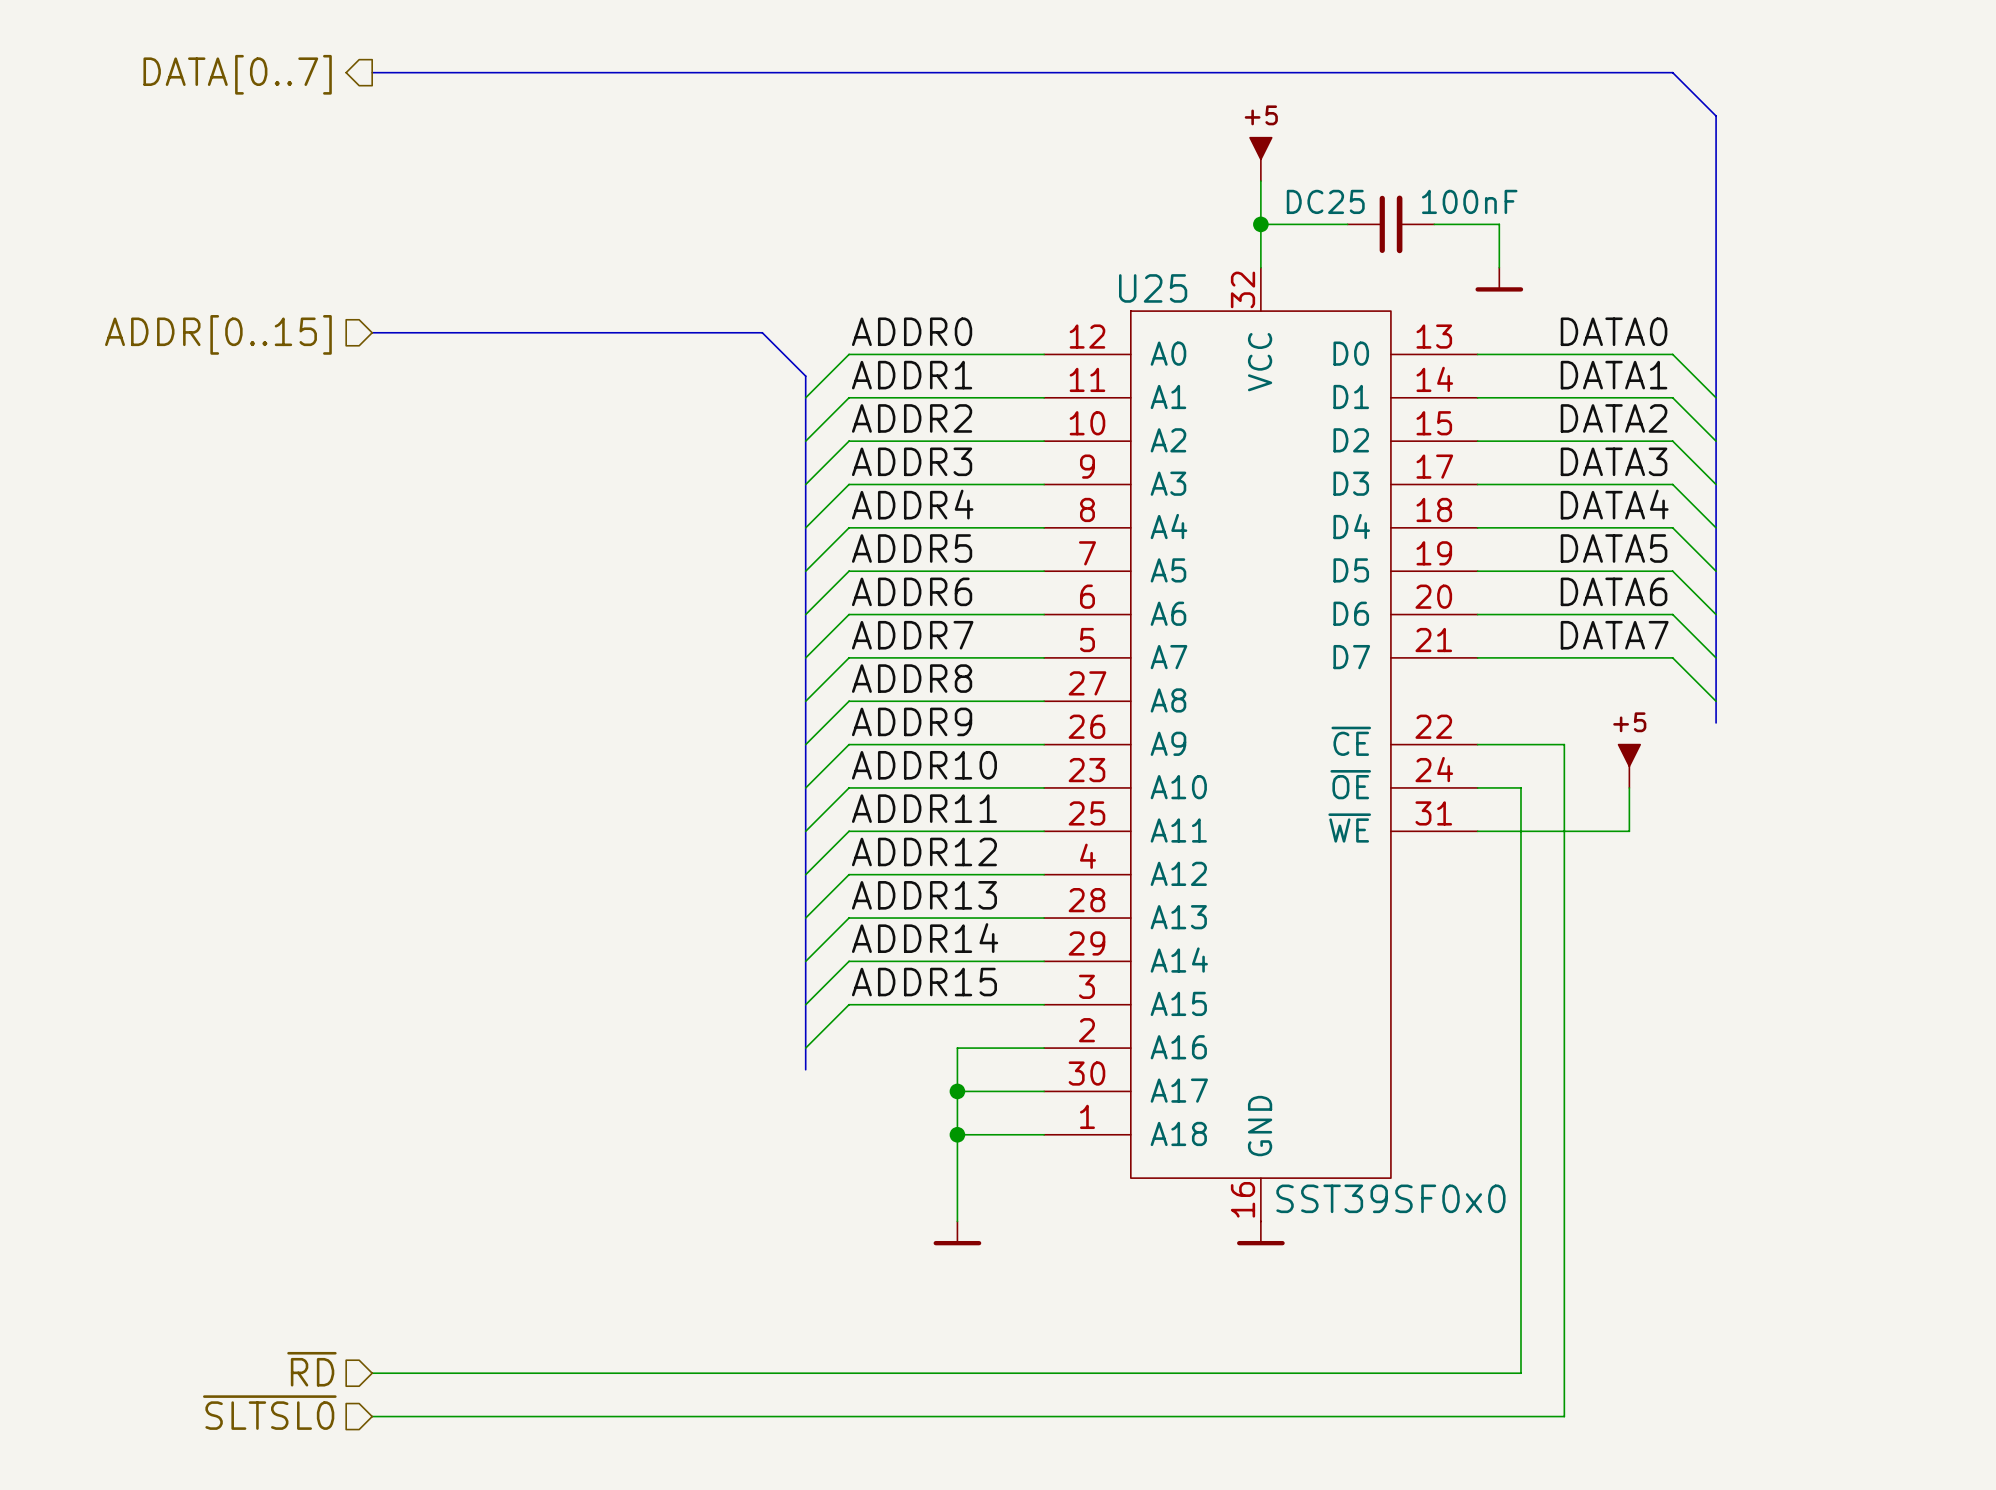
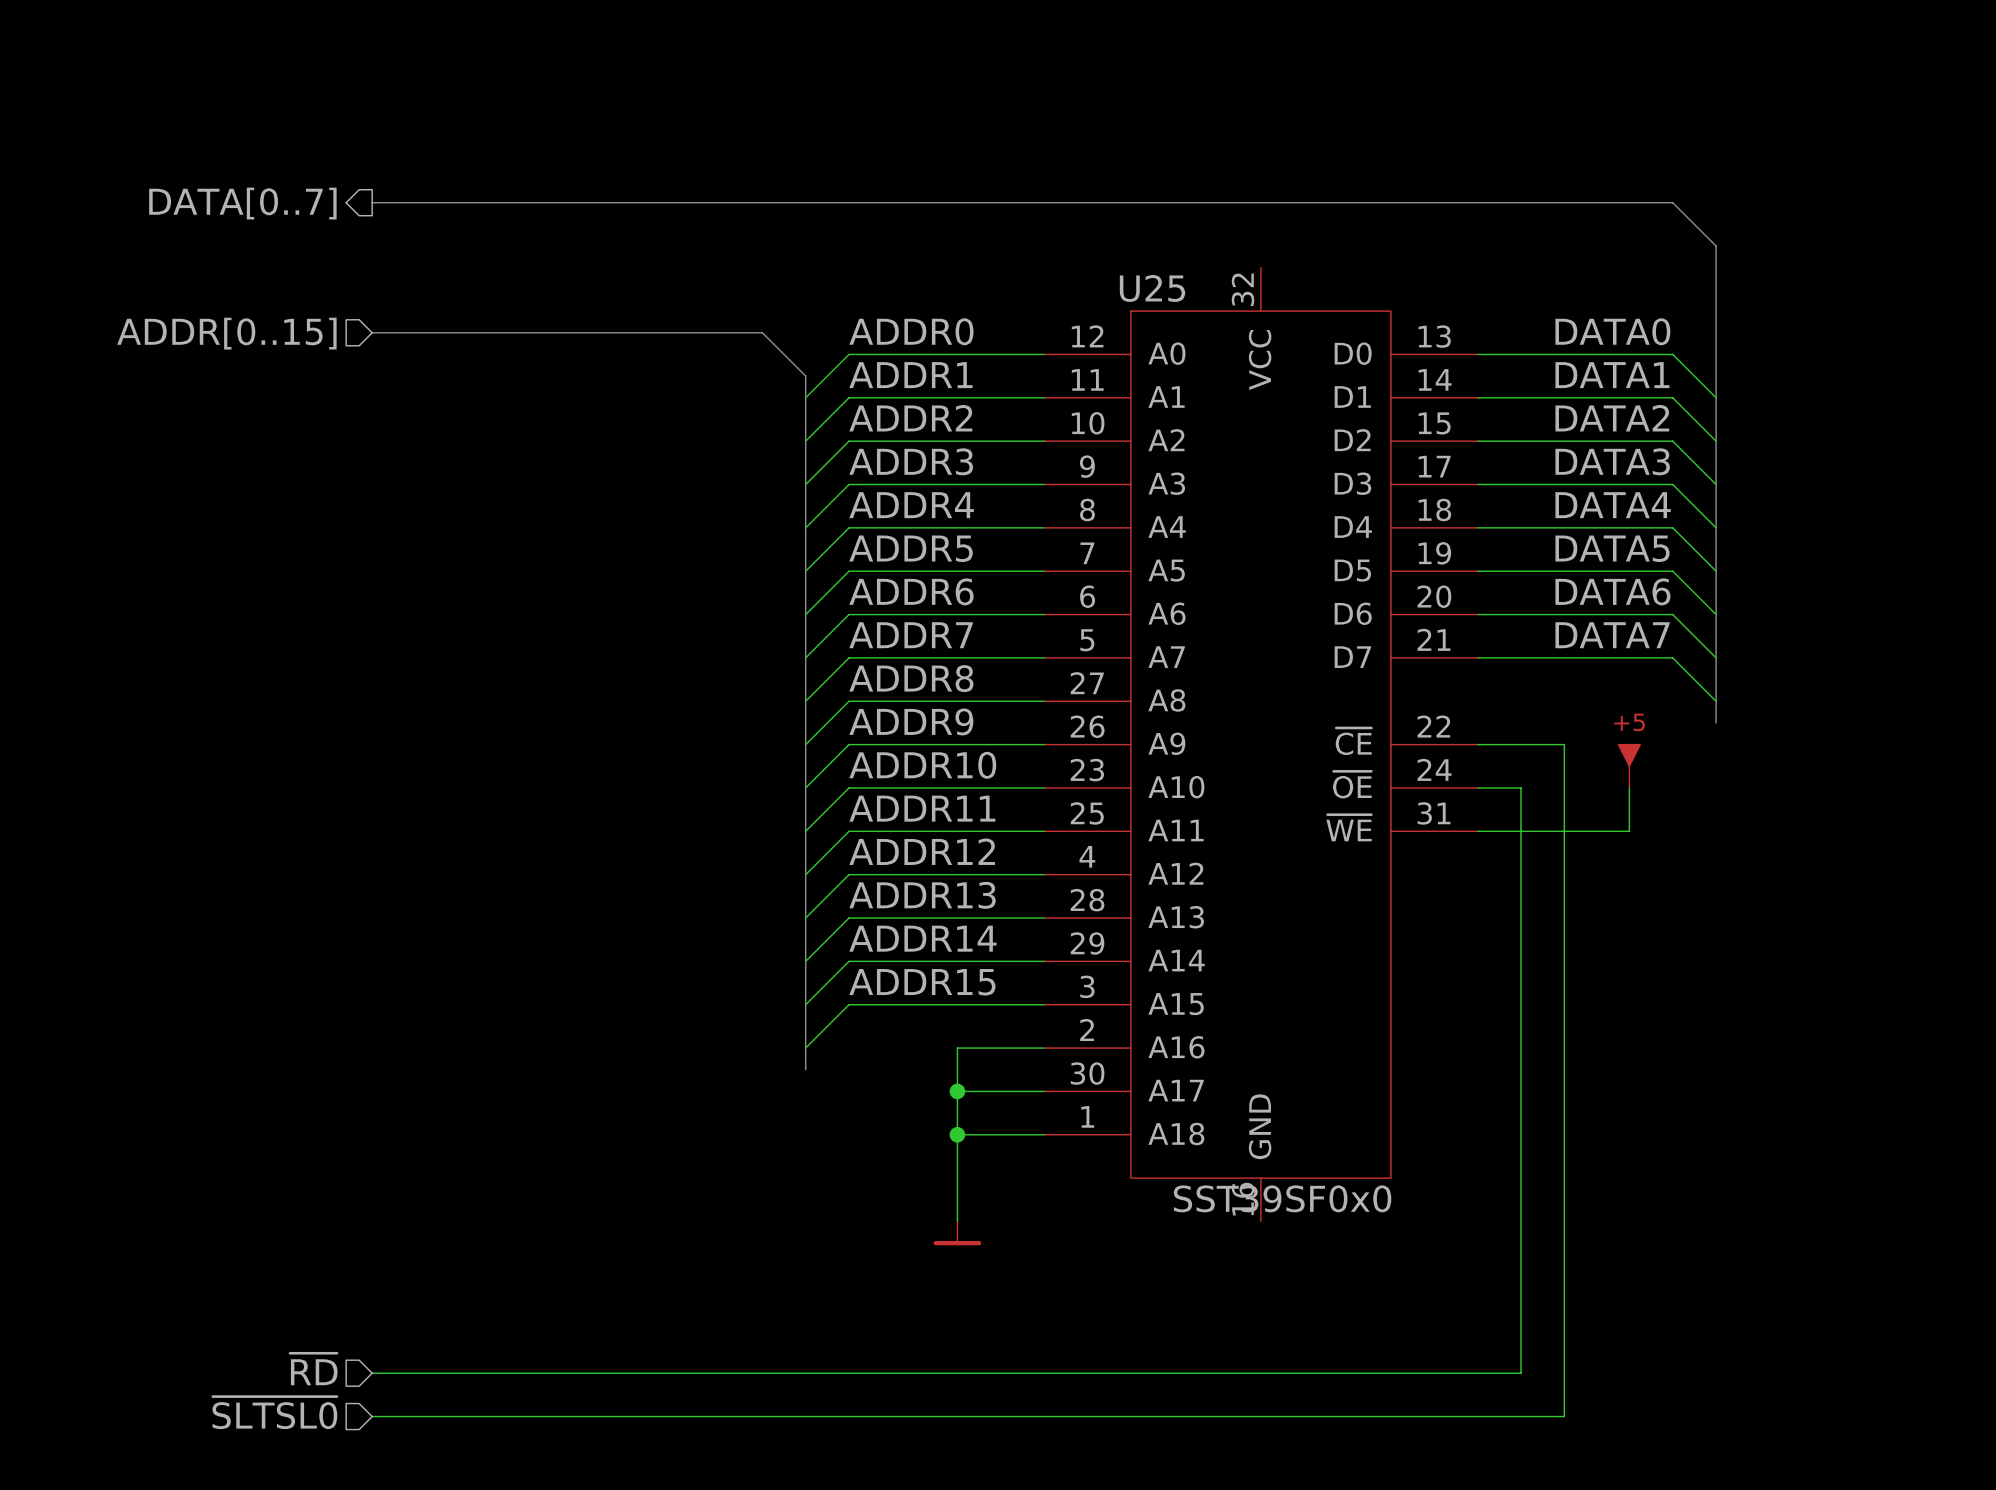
bus: (372, 72) (1672, 72) (1716, 116) (1716, 246) -> (372, 202) (1672, 202) (1716, 246)
hierarchical label position: DATA[0..7] (237, 74) -> DATA[0..7] (242, 203)
power symbol: (1260, 159) -> none
wire: (1260, 181) (1260, 267) -> none
wire: (1260, 224) (1347, 224) -> none
junction: (1260, 224) -> none
DC25: 100nF (1390, 224) -> none
wire: (1434, 224) (1499, 224) (1499, 267) -> none
power symbol: (1499, 279) -> none
U25 value position: SST39SF0x0 (1390, 1198) -> SST39SF0x0 (1282, 1198)
power symbol: (1260, 1233) -> none

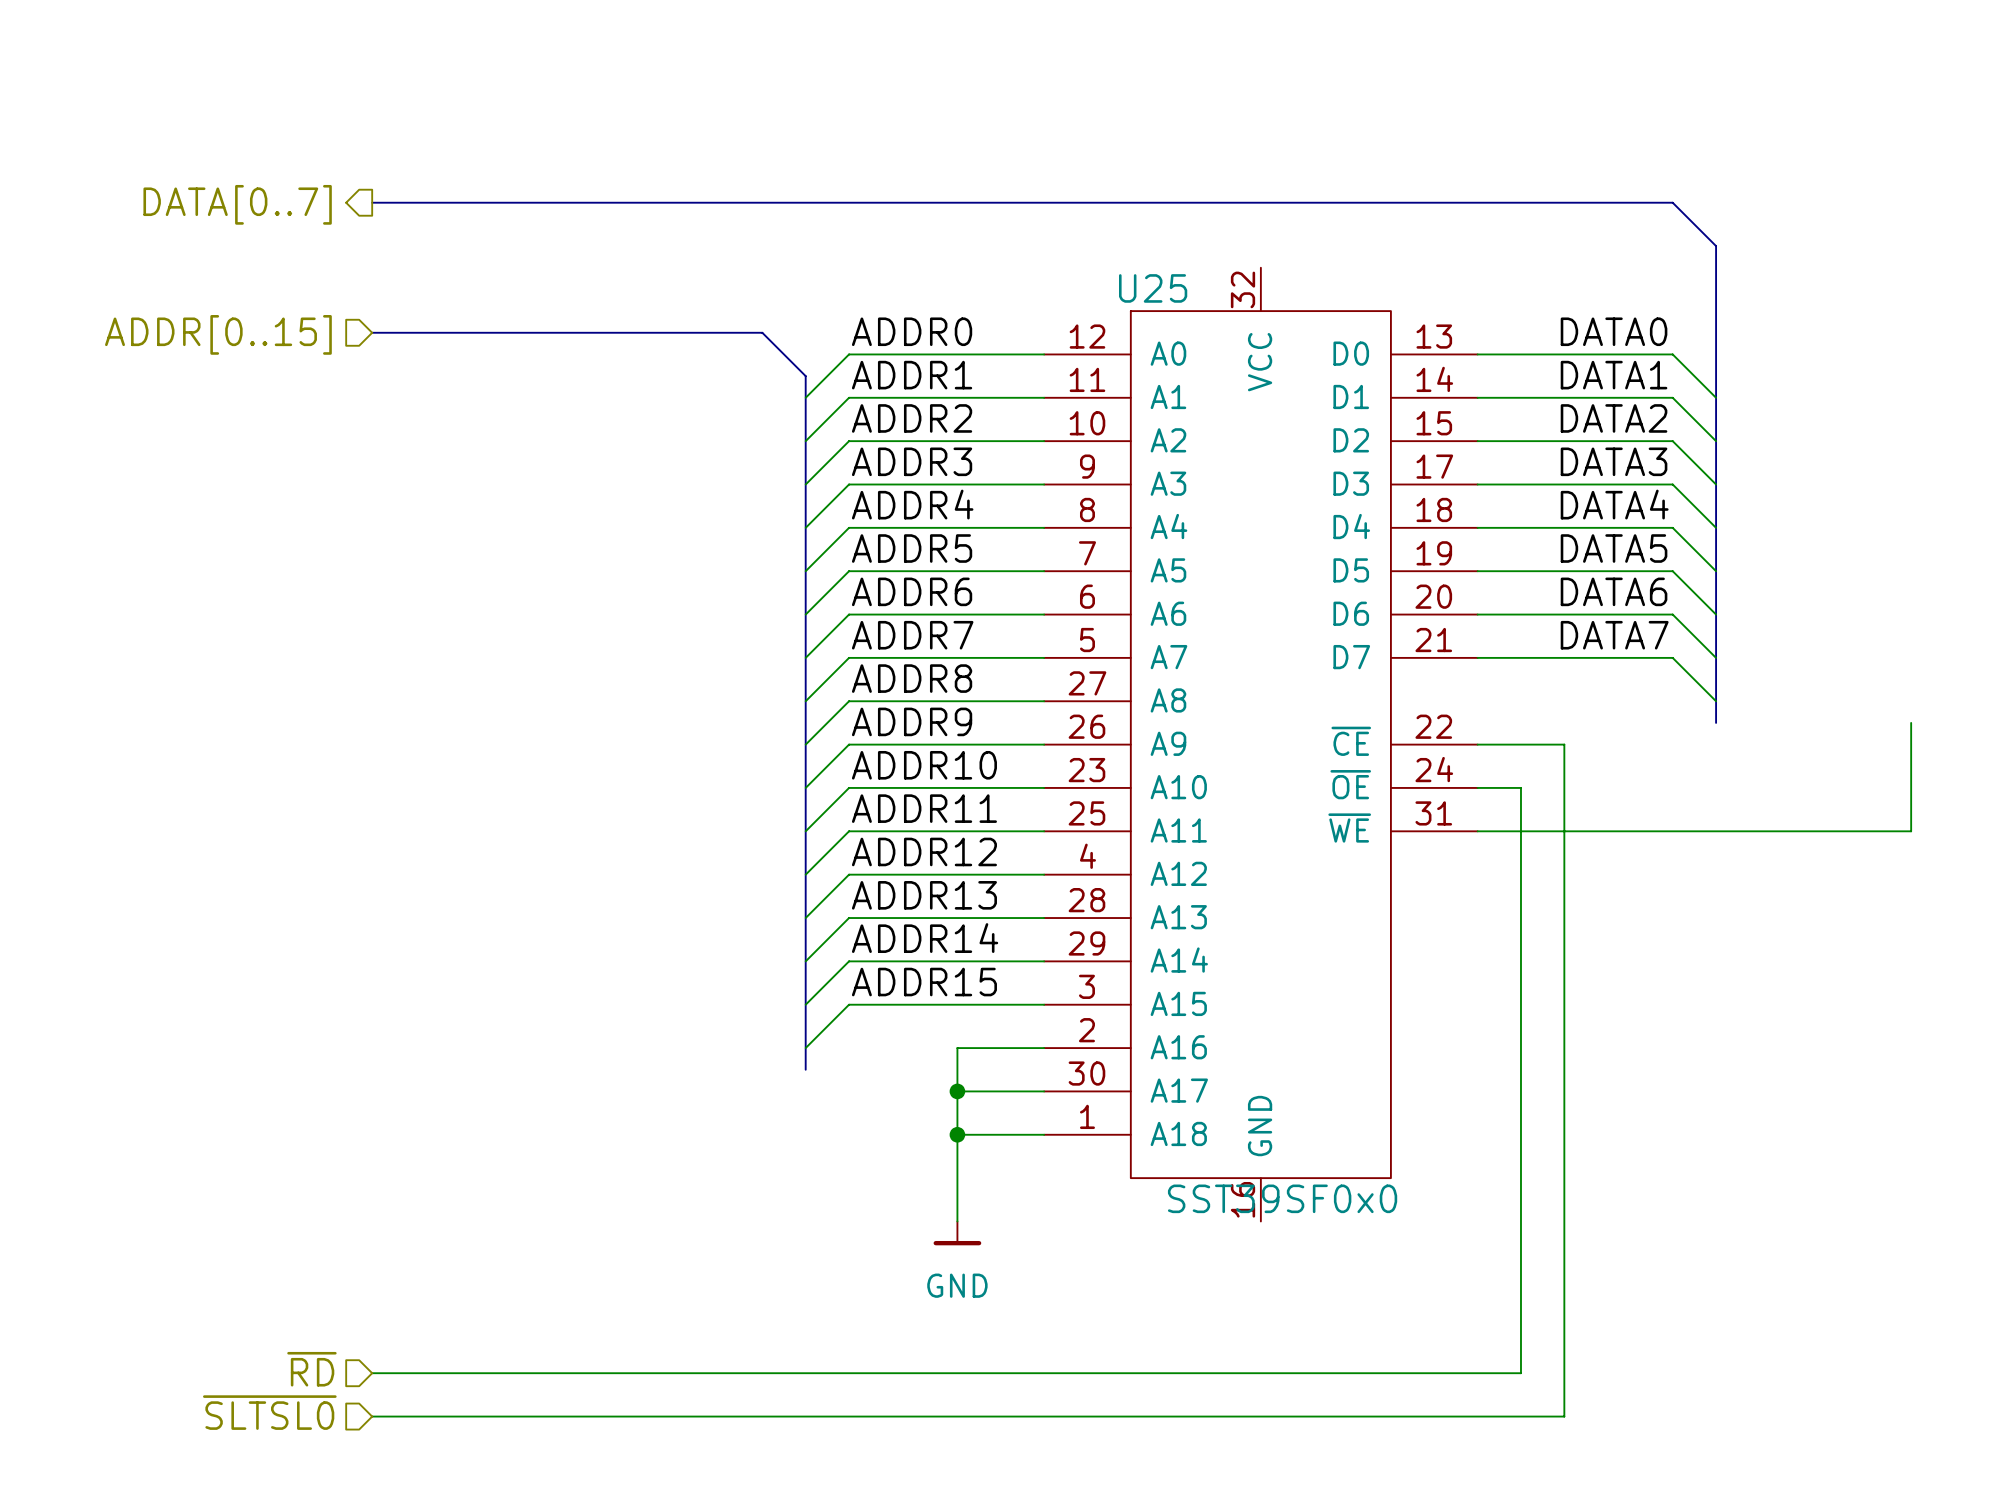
power symbol: (1629, 766) -> none
wire: (1629, 787) (1629, 831) -> (1911, 722) (1911, 831) (1629, 831)
power symbol text: none -> GND (957, 1285)

